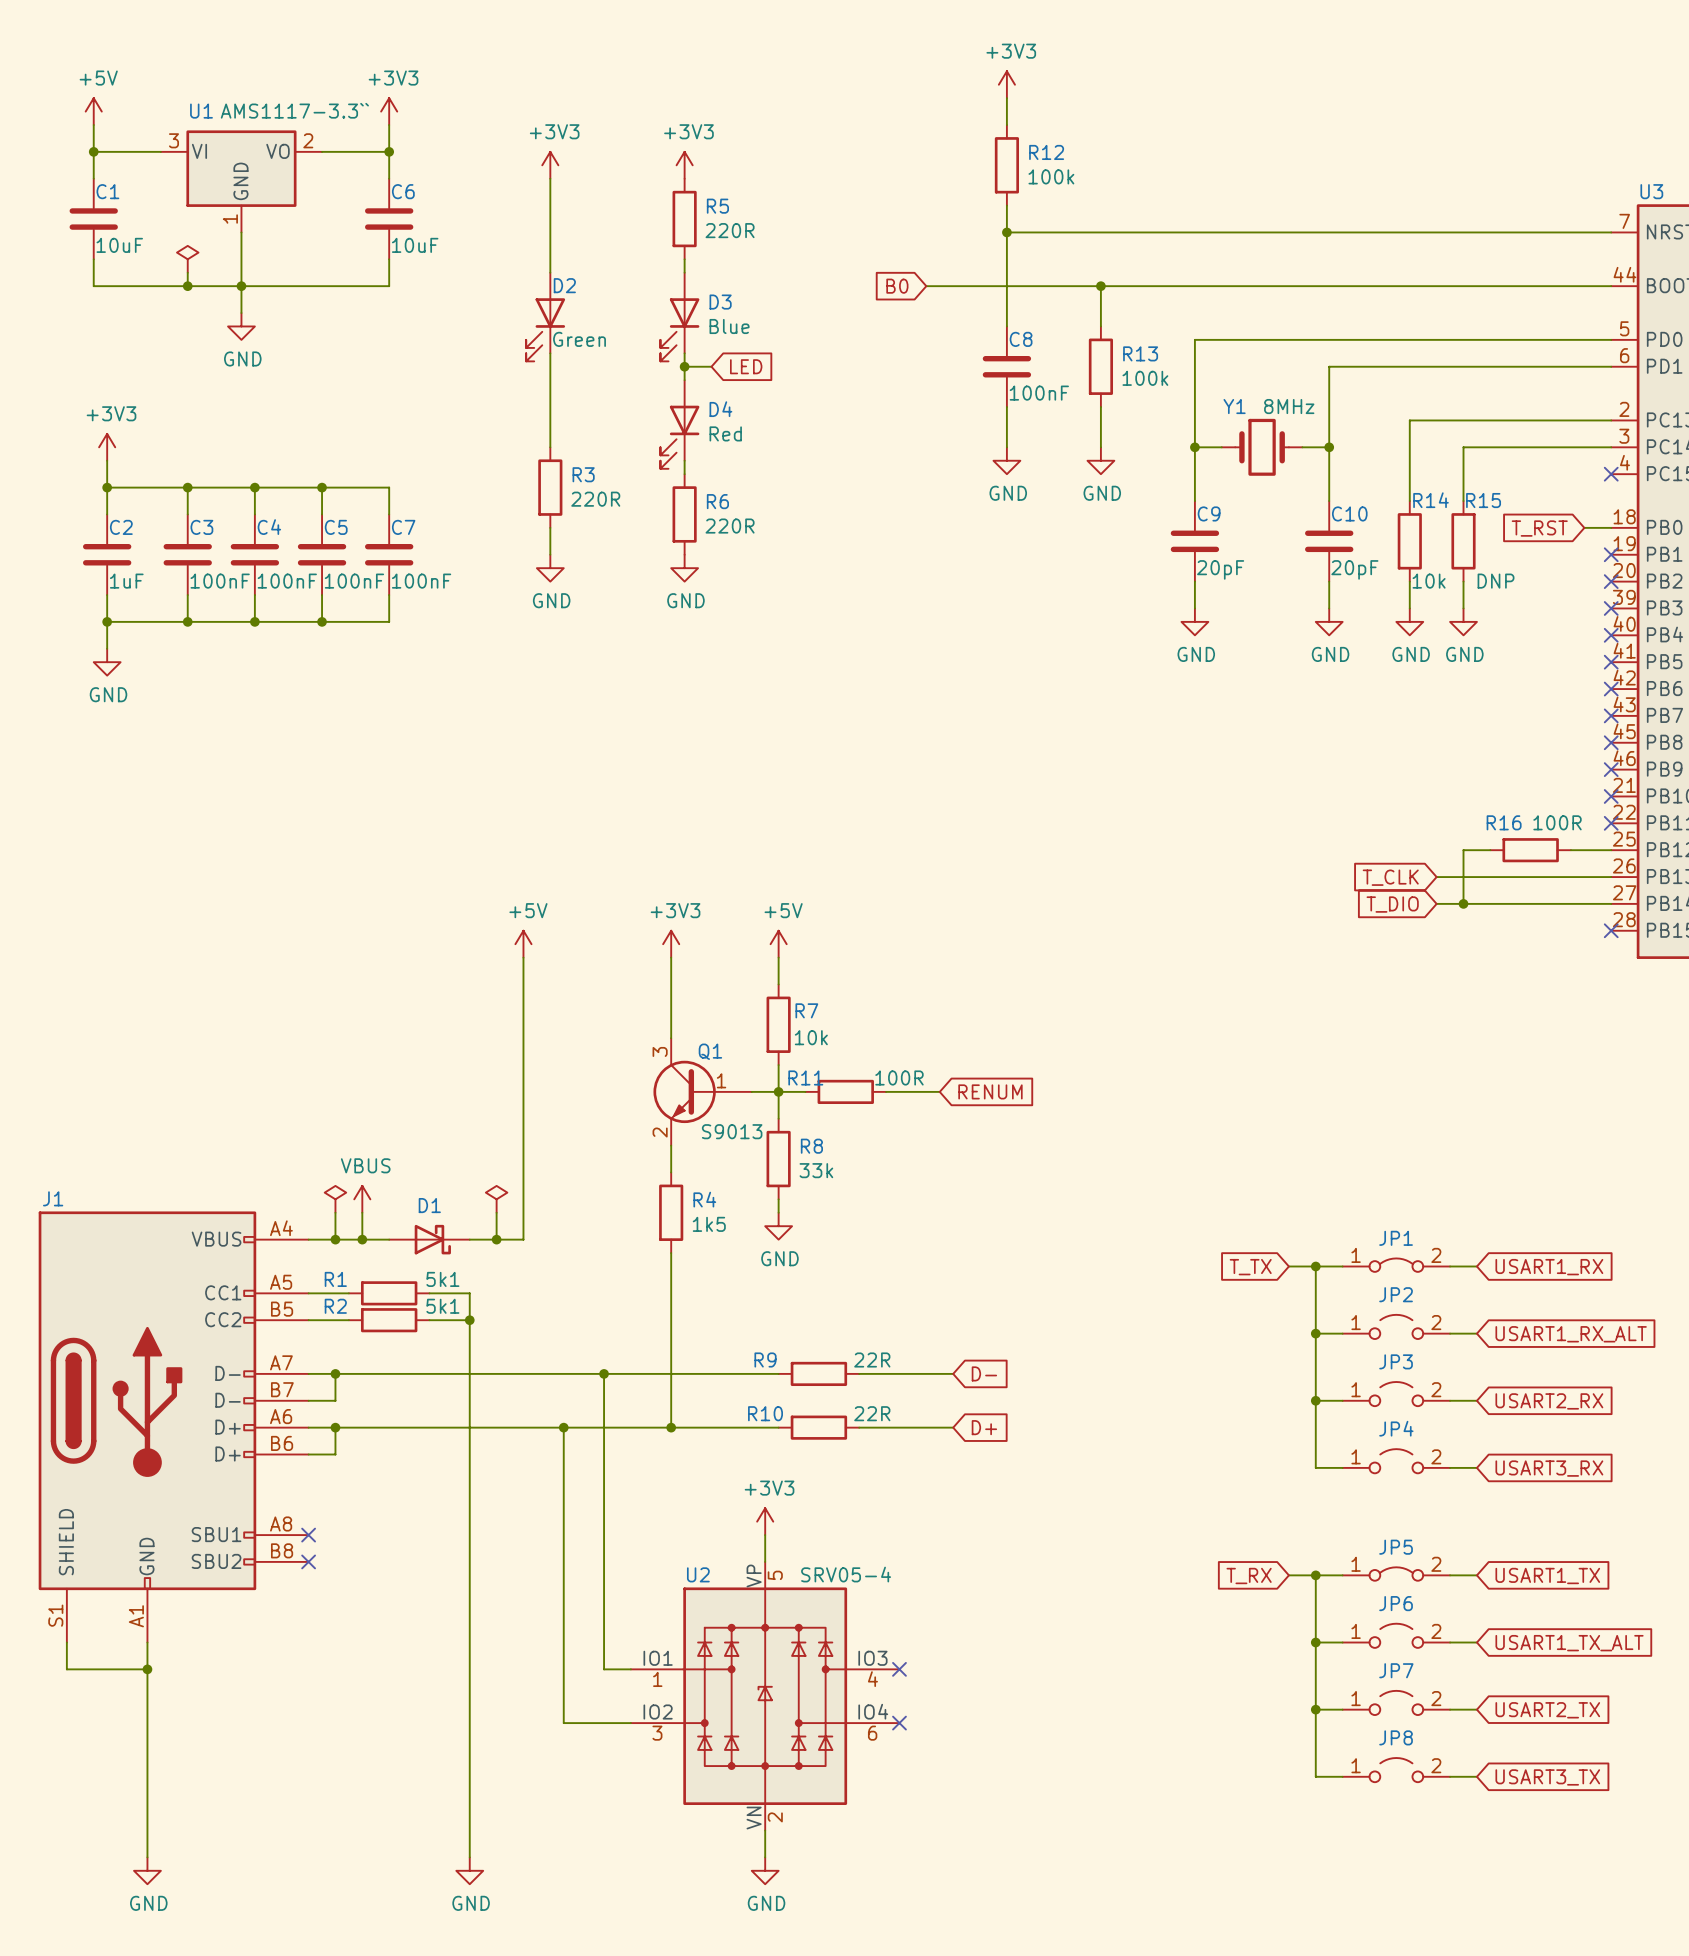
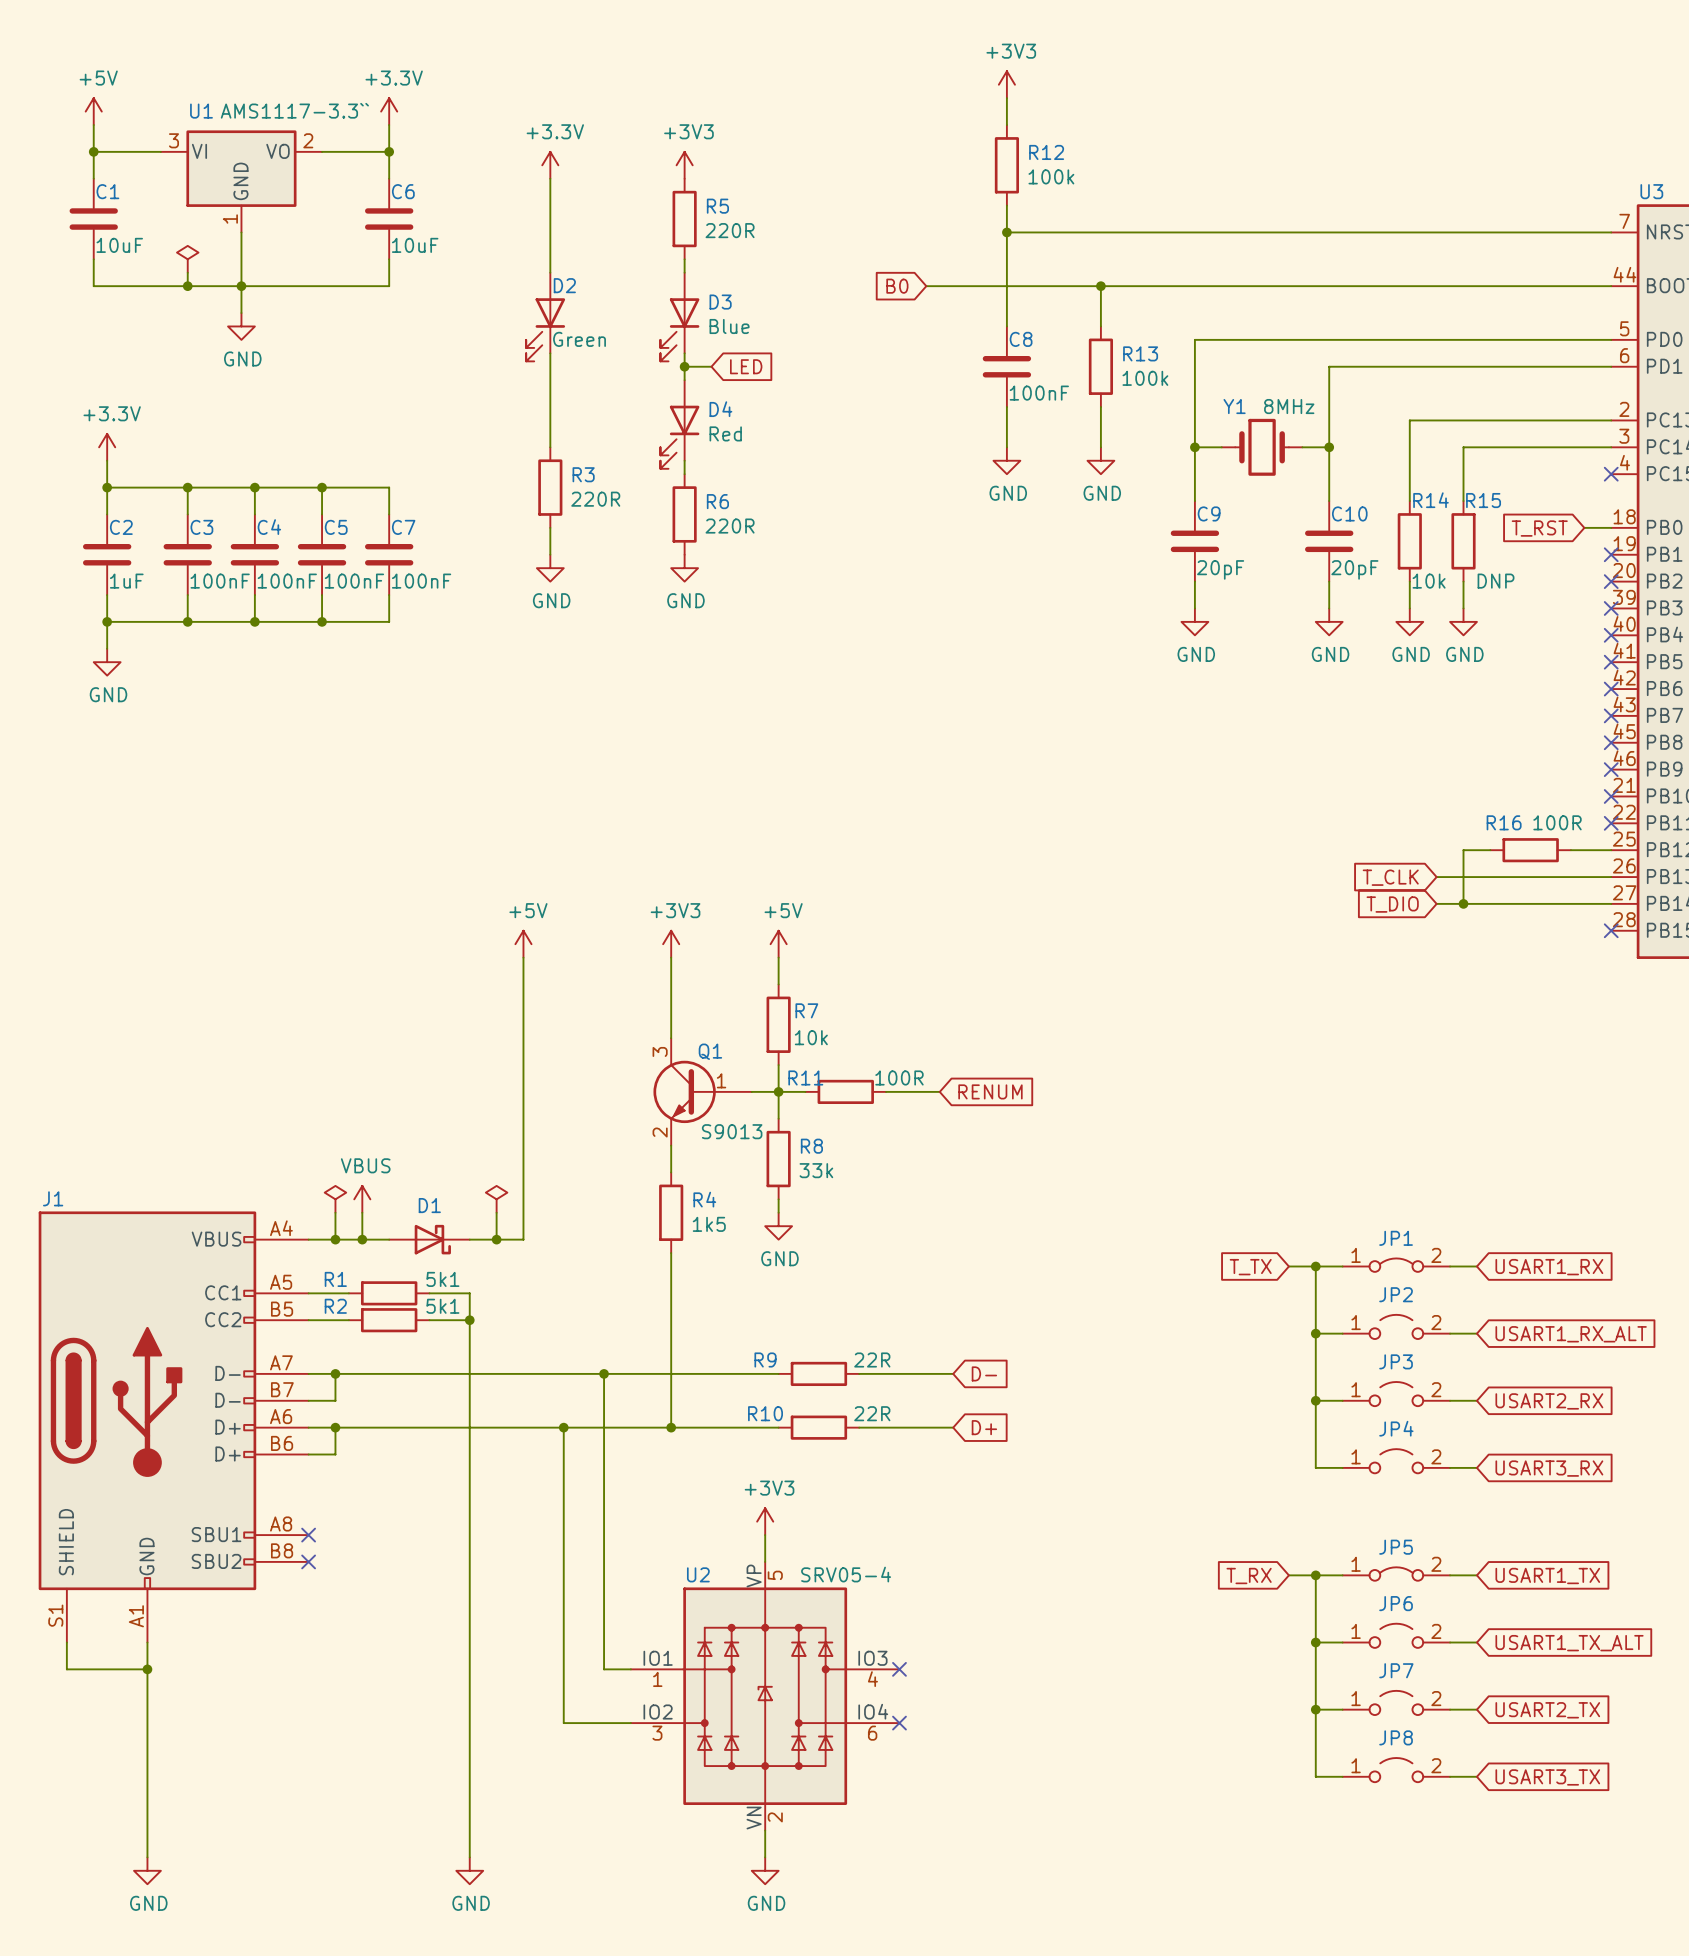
power symbol: +3V3 (389, 111) -> +3.3V (389, 111)
power symbol: +3V3 (550, 165) -> +3.3V (550, 165)
power symbol: +3V3 (107, 447) -> +3.3V (107, 447)

